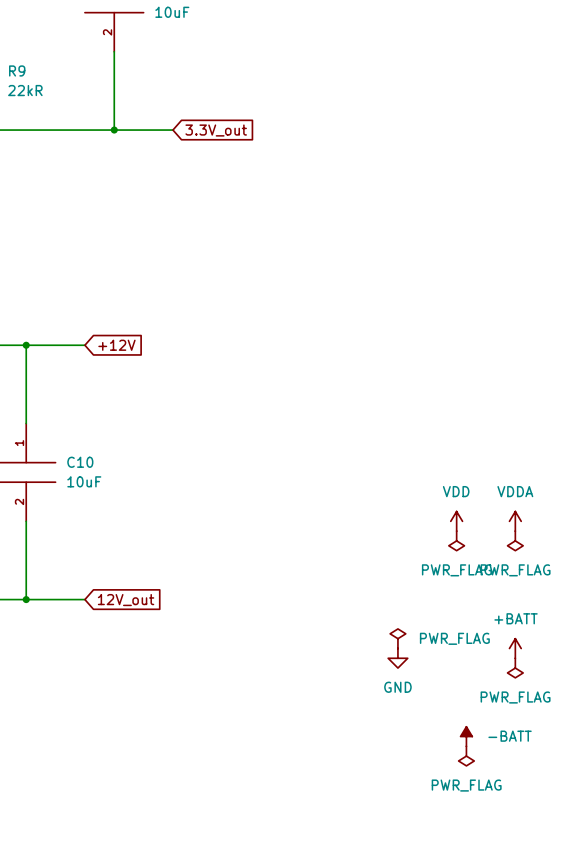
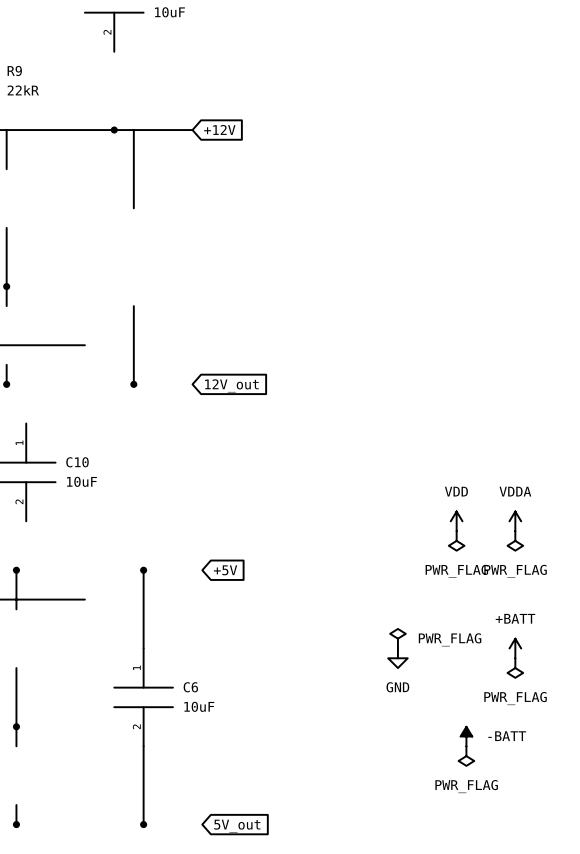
wire: (114, 51) (114, 130) -> (133, 130) (133, 208)
wire: none -> (6, 130) (6, 169)
wire: none -> (172, 130) (192, 130)
global label: 3.3V_out (216, 130) -> none
global label: none -> +12V (219, 129)
wire: none -> (6, 227) (6, 306)
junction: none -> (6, 286)
wire: (26, 345) (26, 423) -> (133, 306) (133, 384)
junction: (26, 345) -> none
global label: +12V (116, 345) -> none
wire: none -> (6, 364) (6, 384)
junction: none -> (6, 384)
junction: none -> (133, 384)
global label: none -> 12V_out (231, 385)
wire: (26, 521) (26, 599) -> (143, 570) (143, 648)
wire: none -> (16, 570) (16, 609)
junction: none -> (143, 570)
global label: none -> +5V (225, 570)
junction position: (26, 599) -> (16, 570)
global label: 12V_out (126, 600) -> none
wire: none -> (16, 668) (16, 746)
C6: none -> 10uF (143, 697)
junction: none -> (16, 726)
wire: none -> (143, 746) (143, 824)
wire: none -> (16, 805) (16, 824)
junction: none -> (16, 824)
junction: none -> (143, 824)
global label: none -> 5V_out (237, 826)

